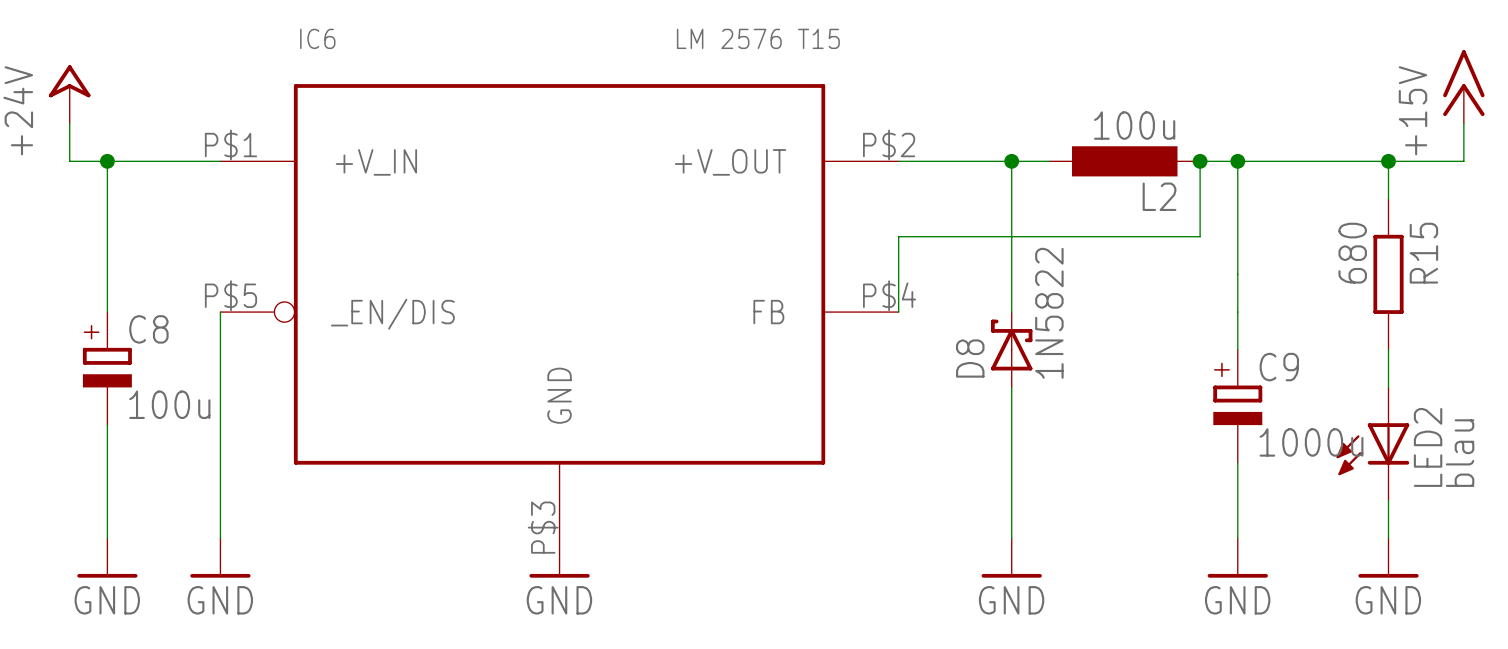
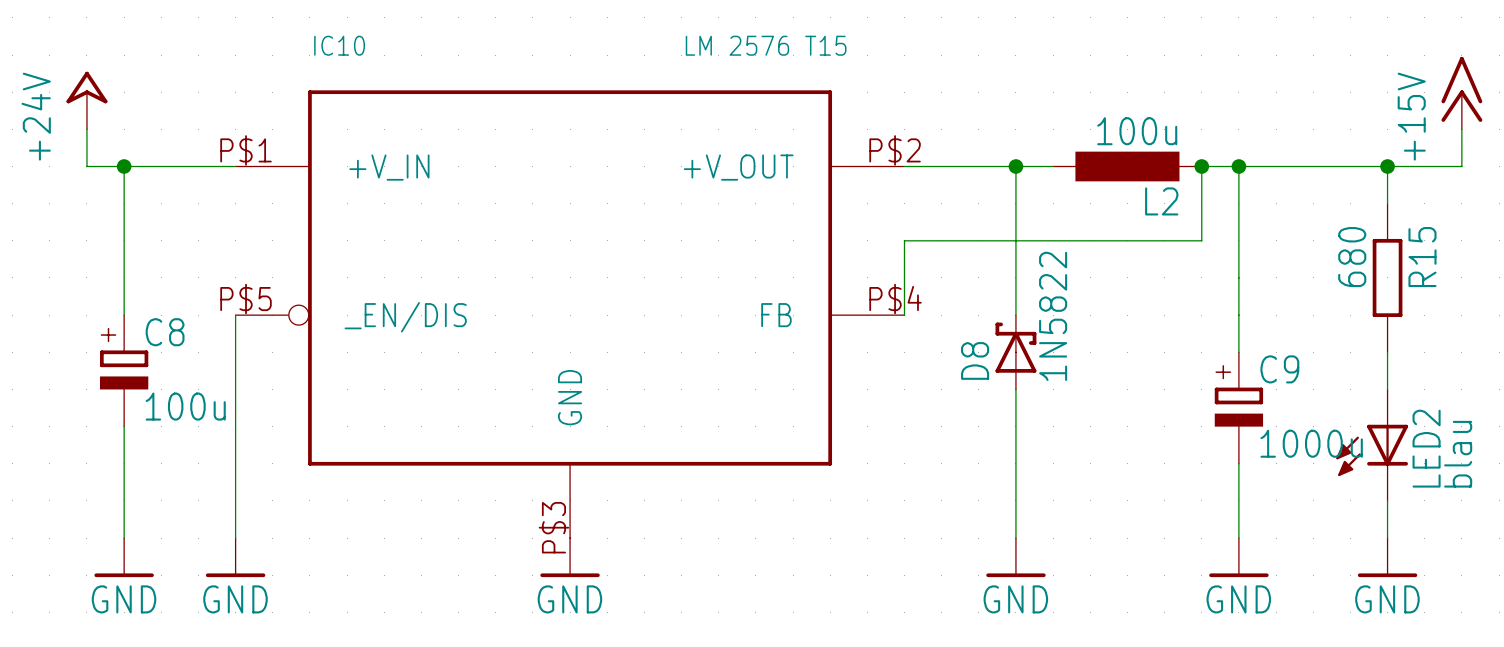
IC6 name: IC6 (317, 38) -> IC10 (339, 45)

